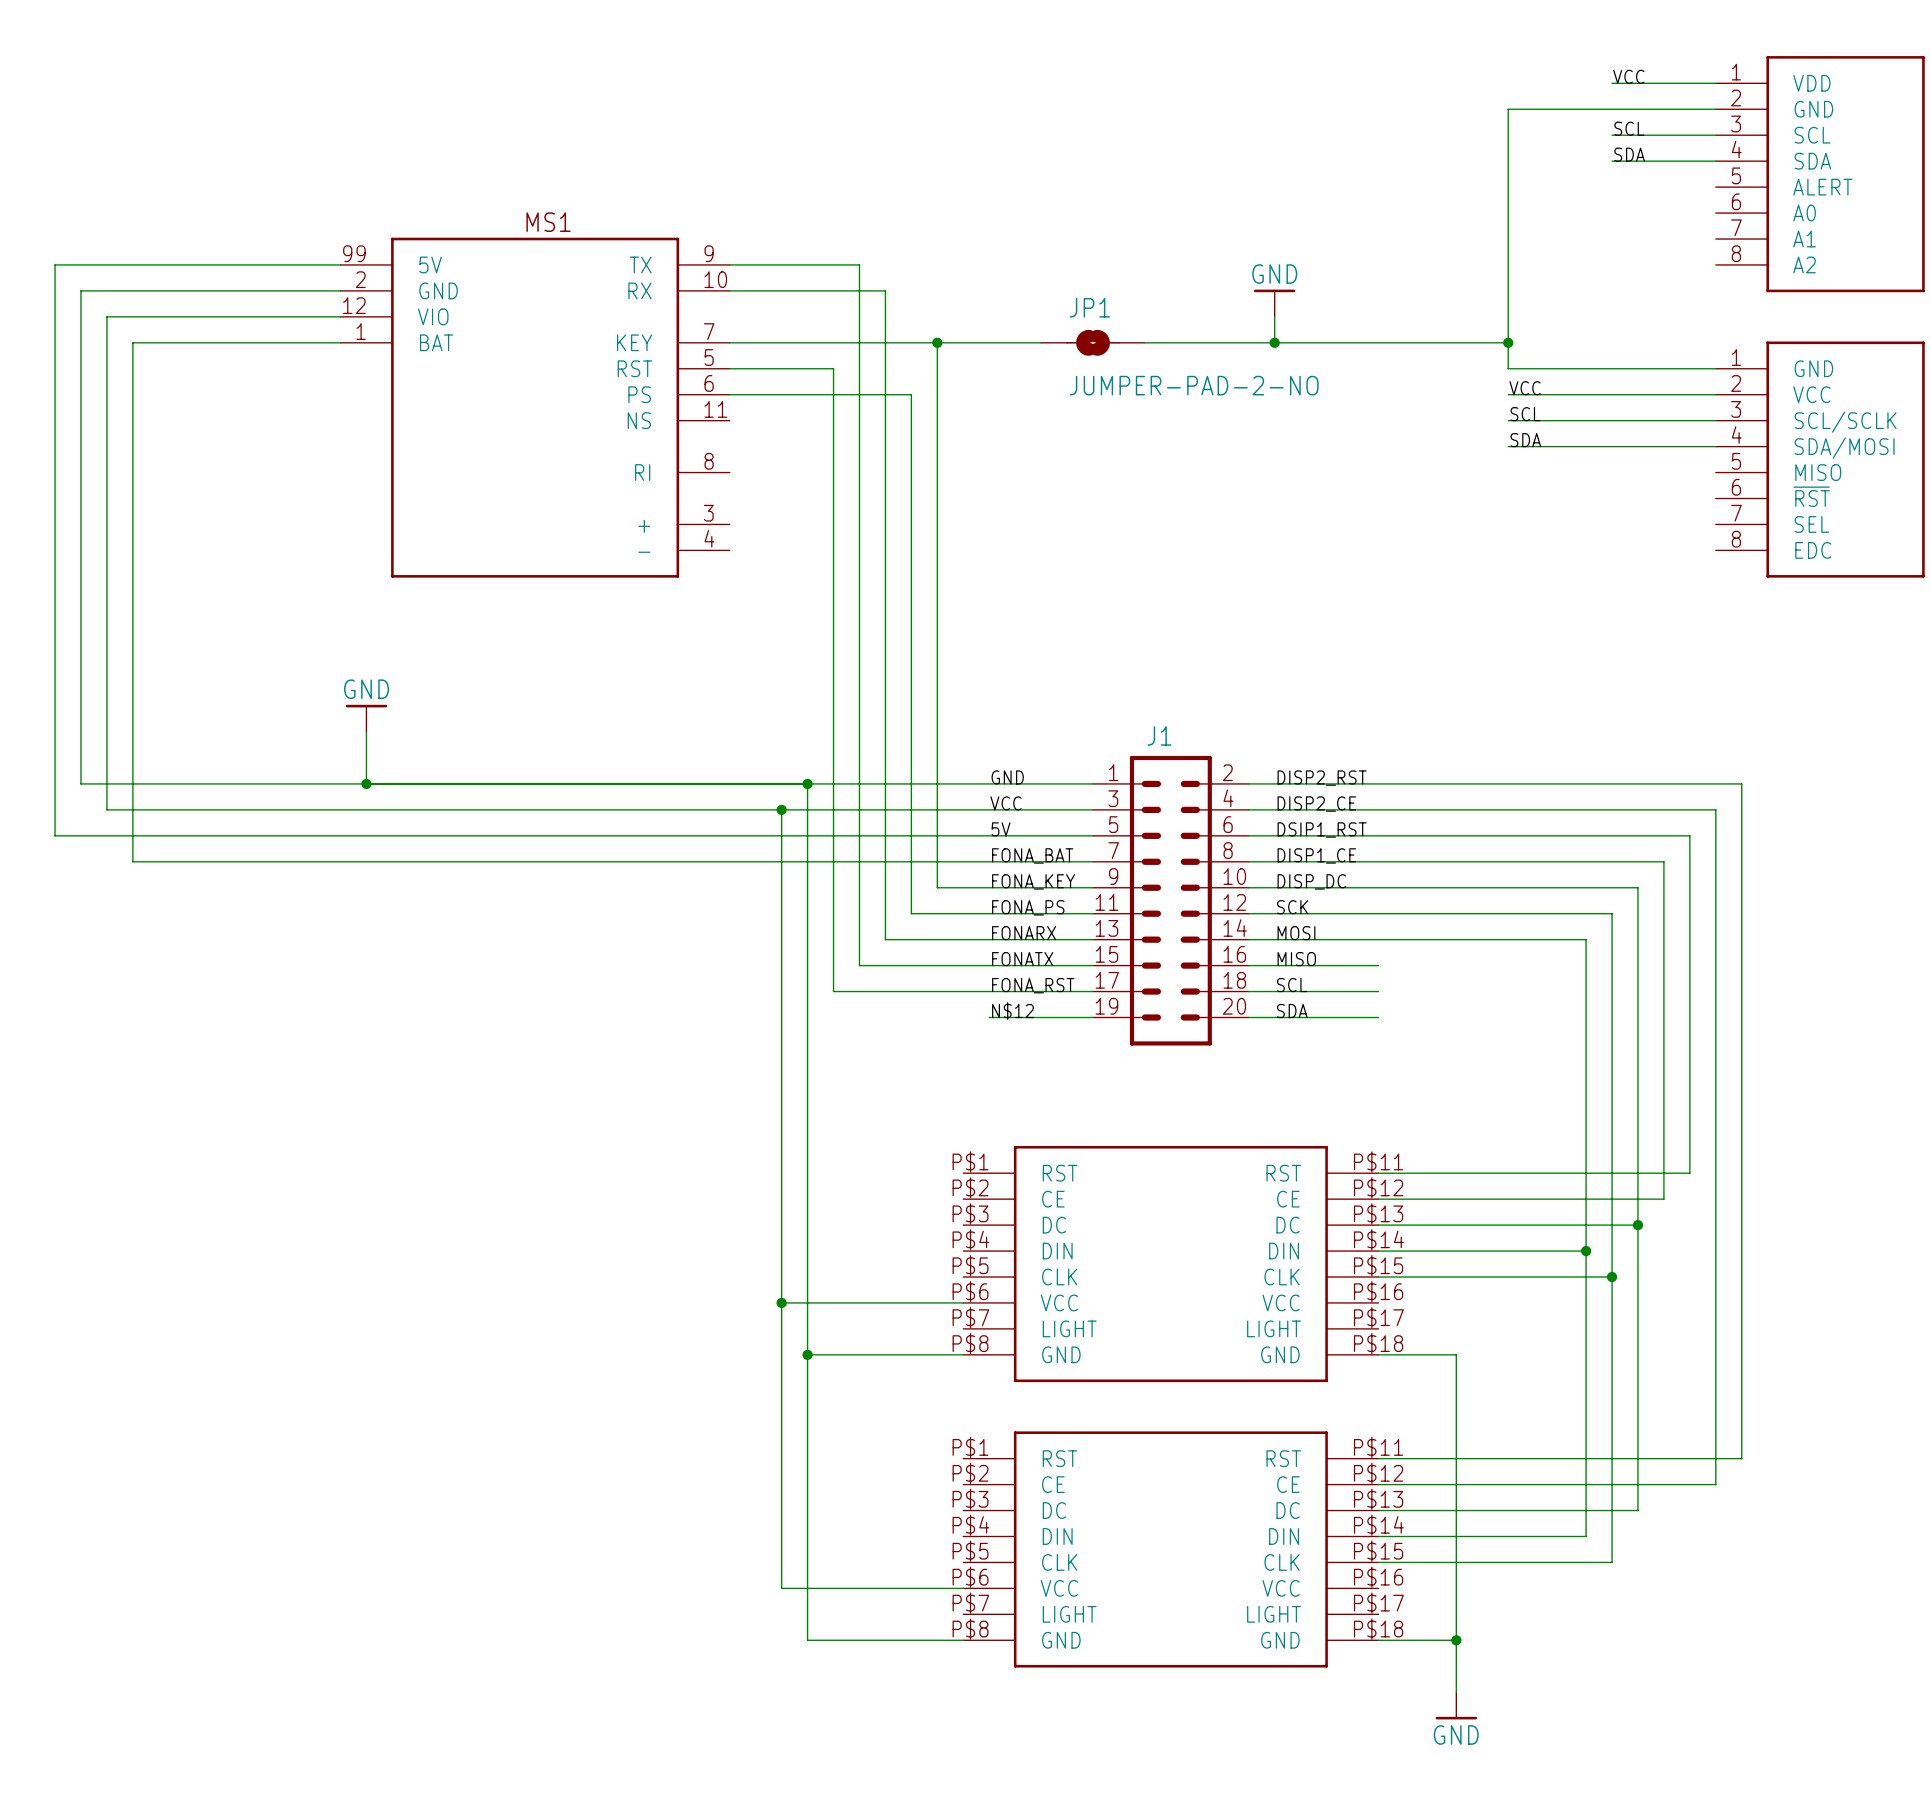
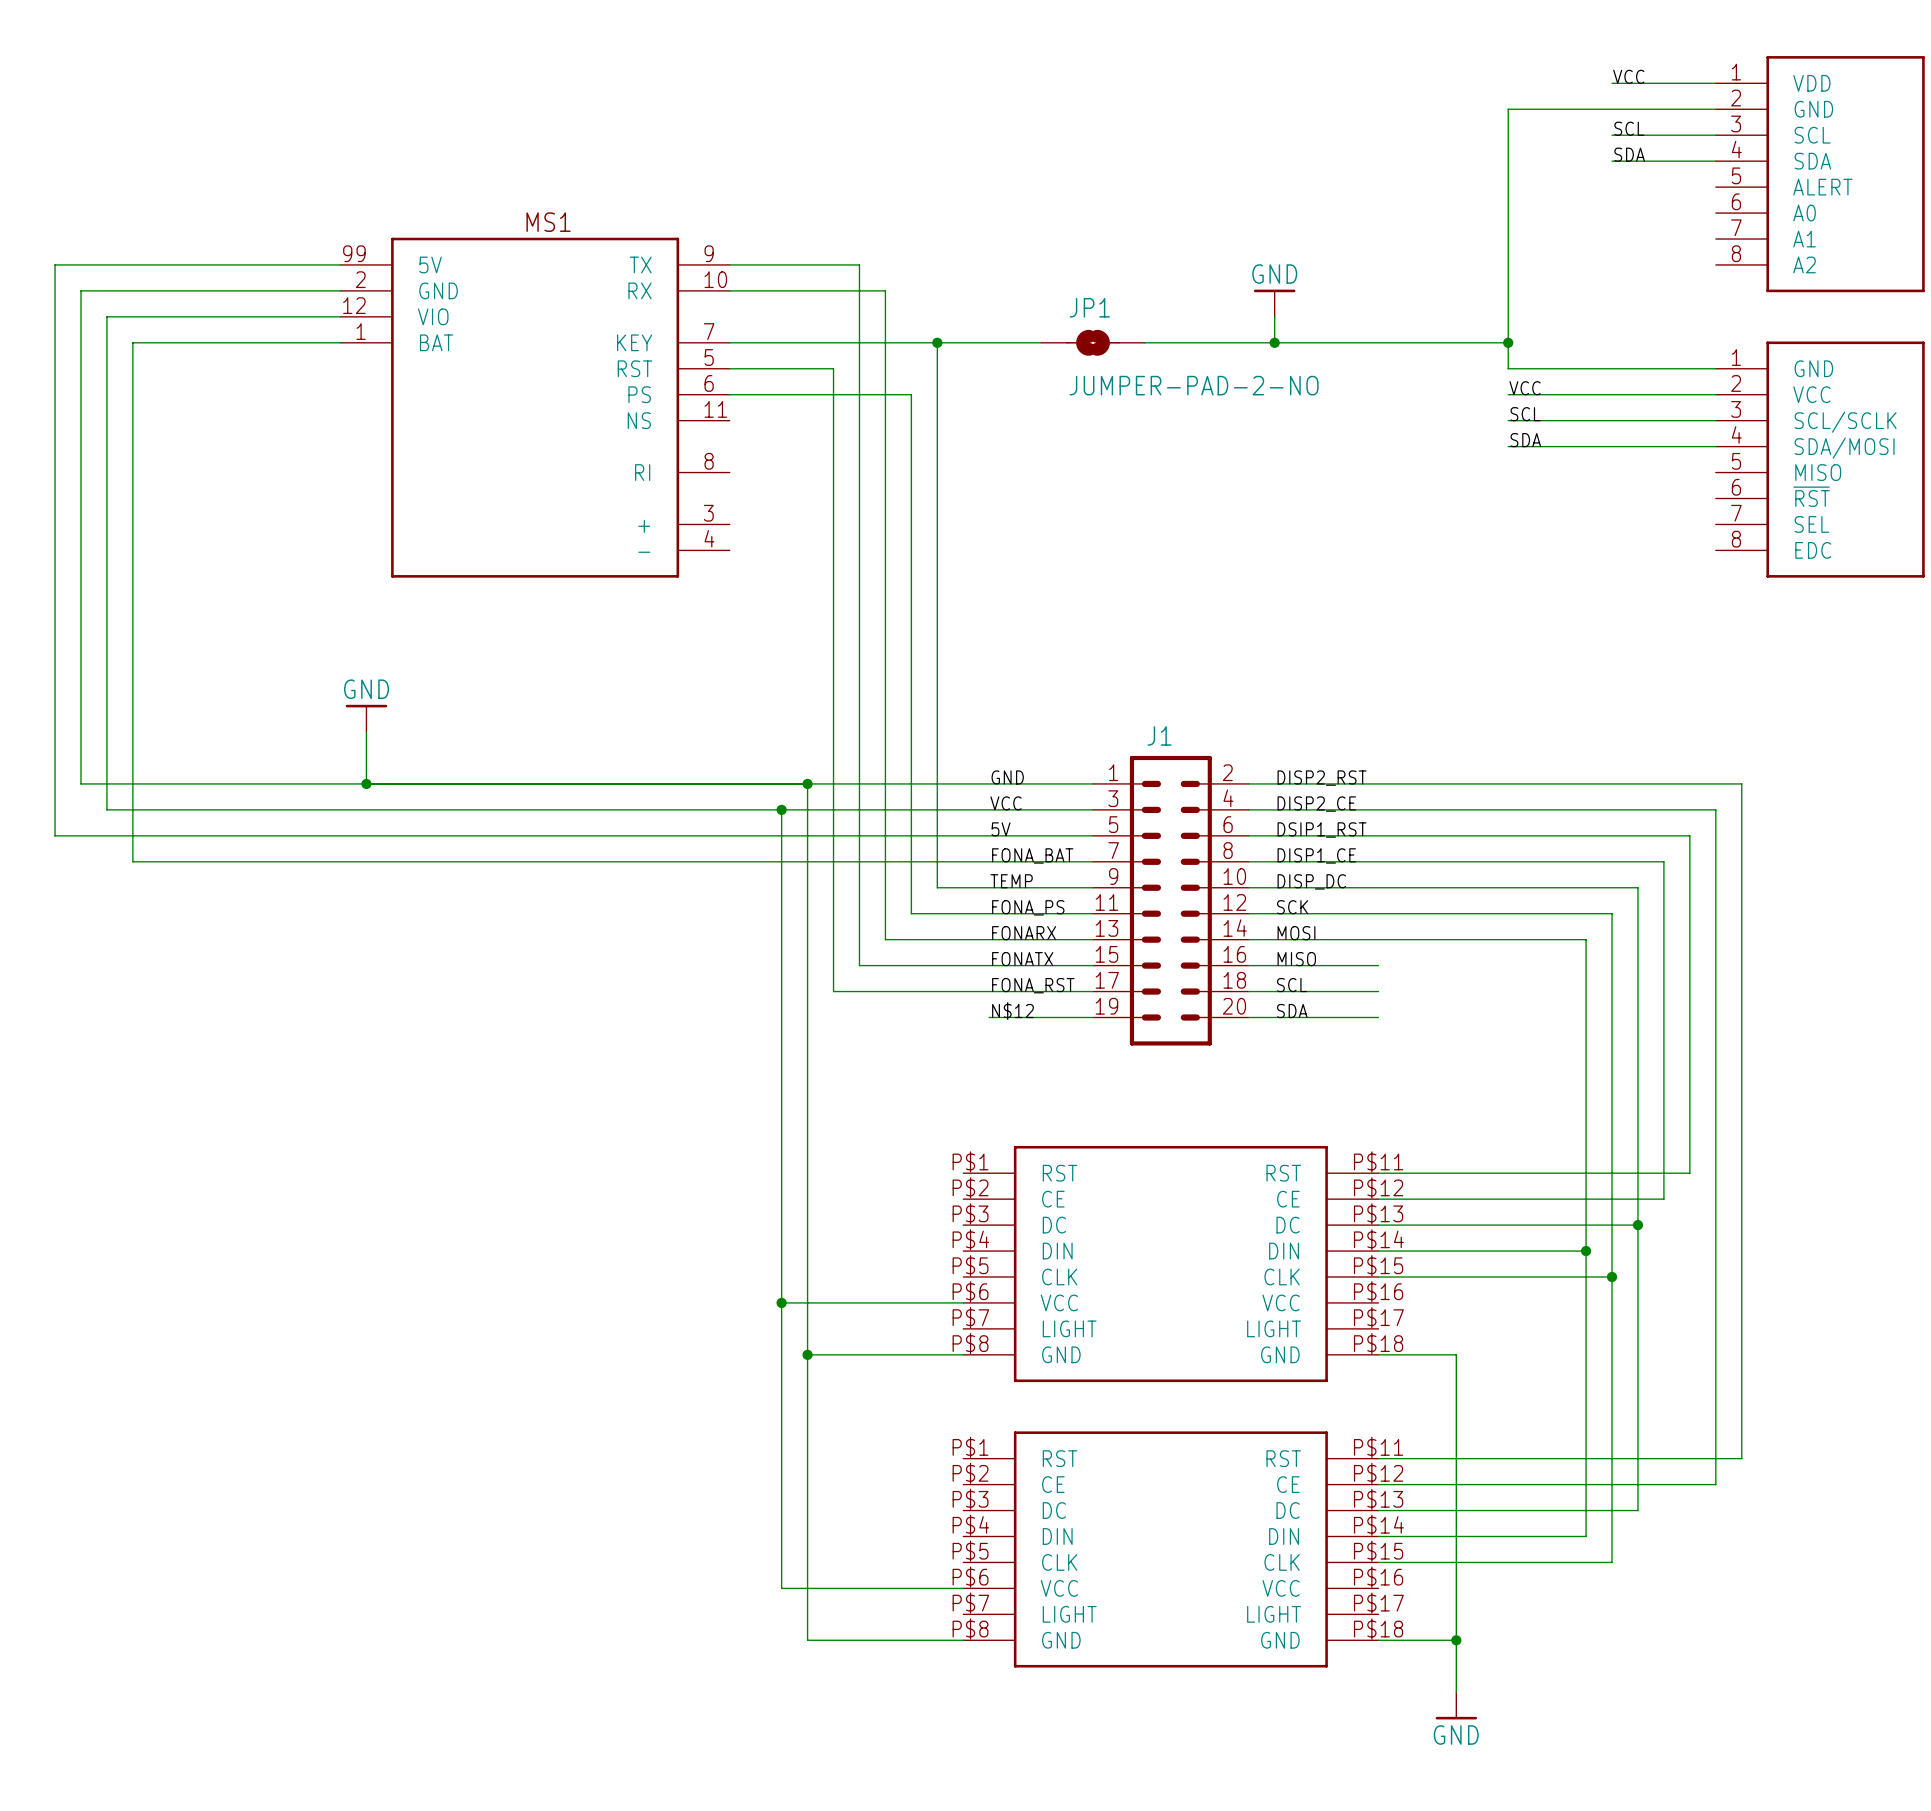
label: FONA_KEY (1033, 881) -> TEMP (1011, 881)

